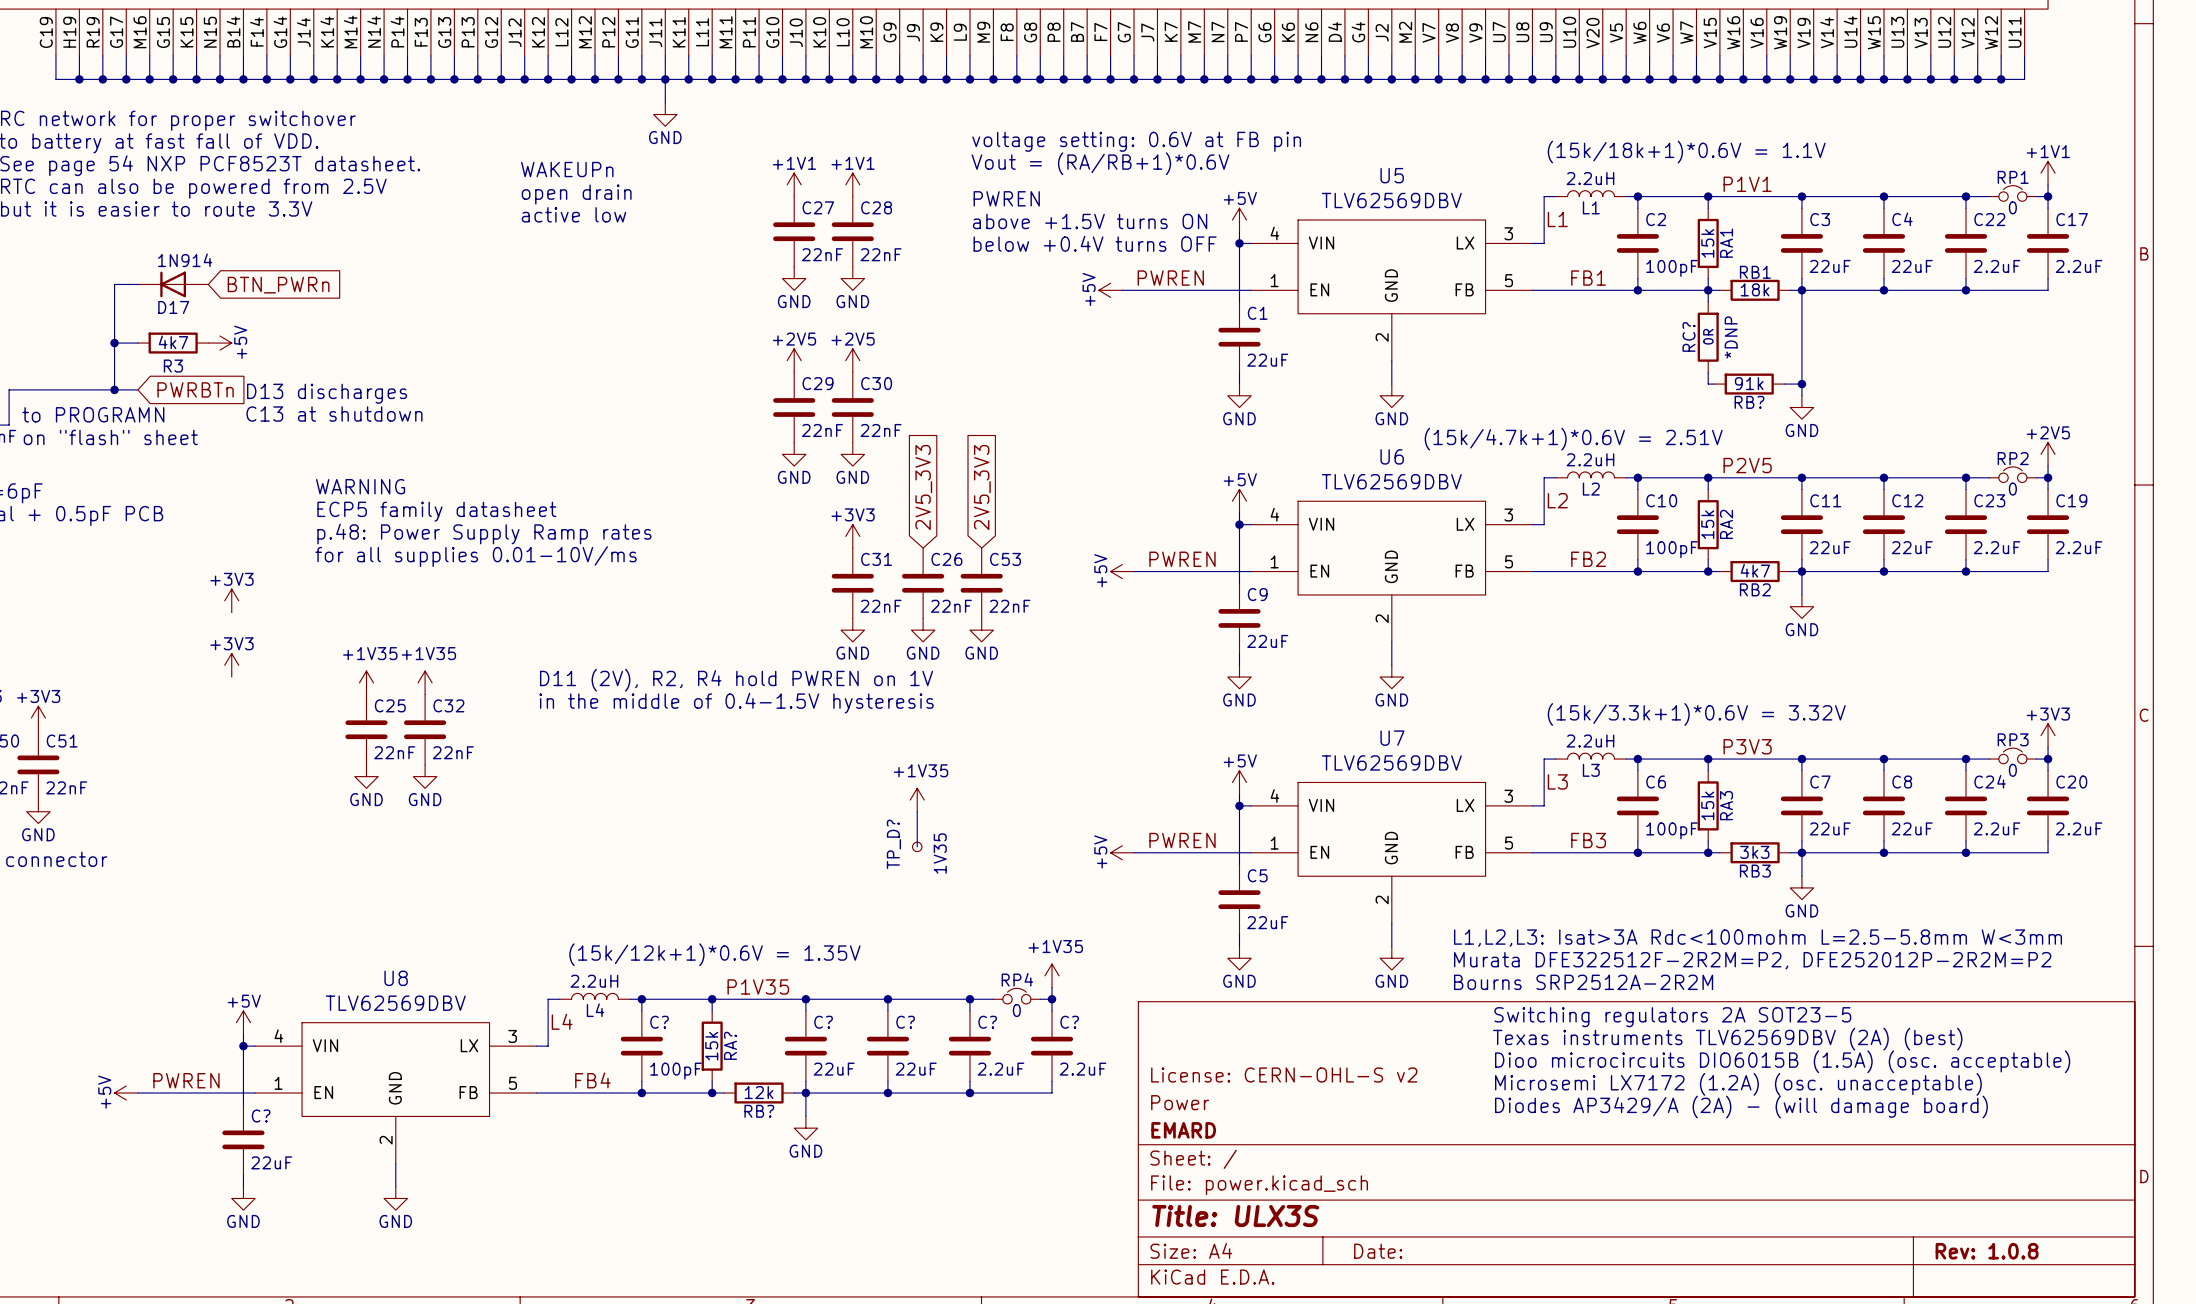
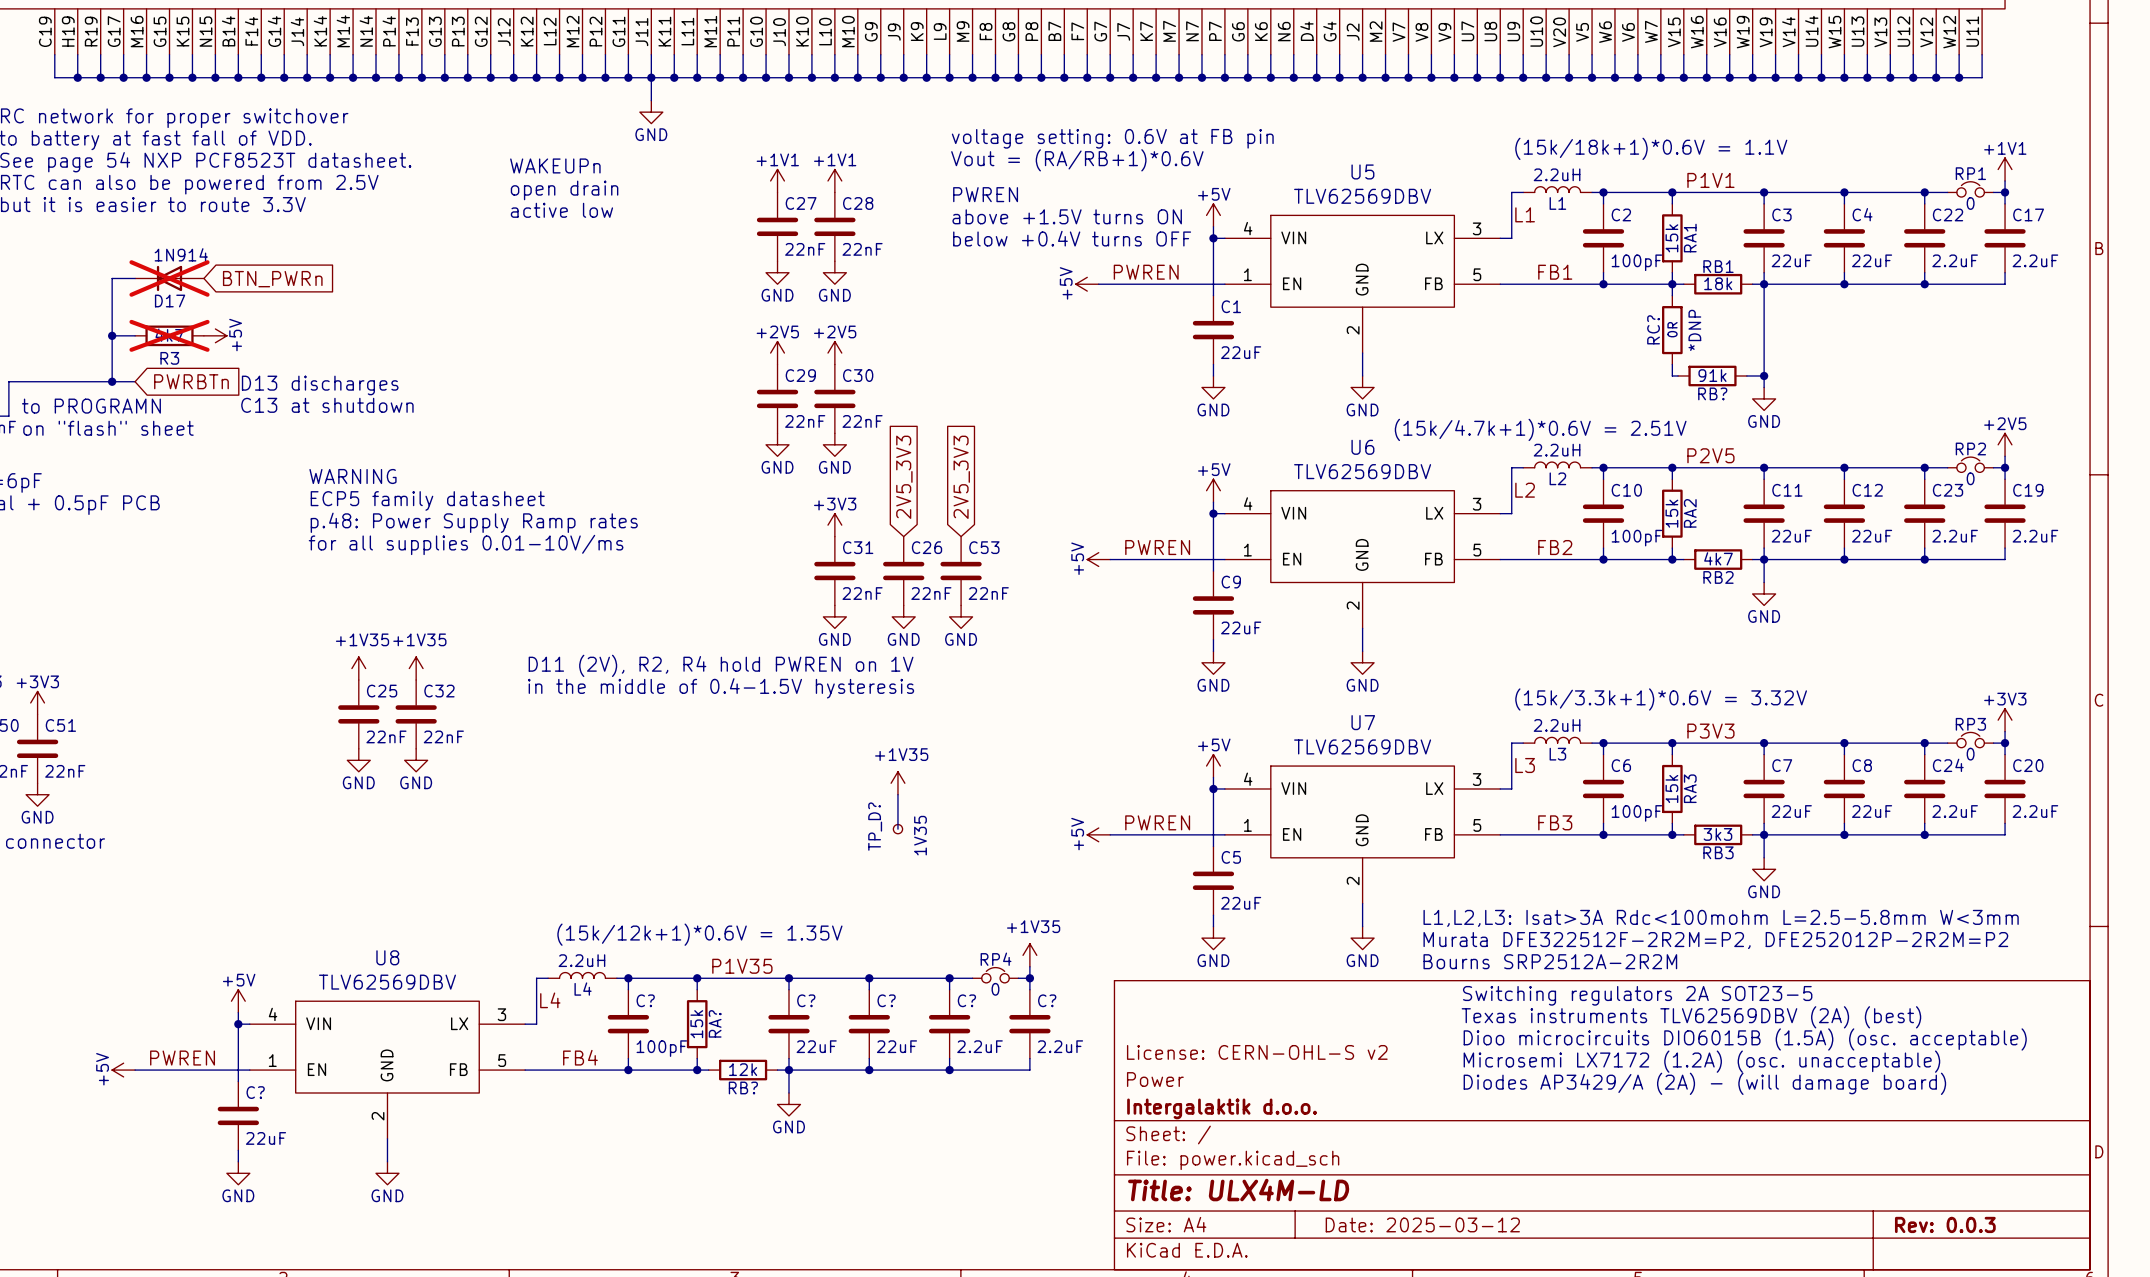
D17 do-not-place cross: none -> (169, 278)
R3 do-not-place cross: none -> (169, 335)
power symbol: +3V3 (231, 600) -> none
power symbol: +3V3 (231, 665) -> none
title block: EMARD (1183, 1130) -> Intergalaktik d.o.o. (1222, 1108)
title block: Title: ULX3S (1235, 1215) -> Title: ULX4M-LD (1238, 1190)
title block: Date: (1378, 1251) -> Date: 2025-03-12 (1422, 1224)
title block: Rev: 1.0.8 (1987, 1251) -> Rev: 0.0.3 (1945, 1224)

